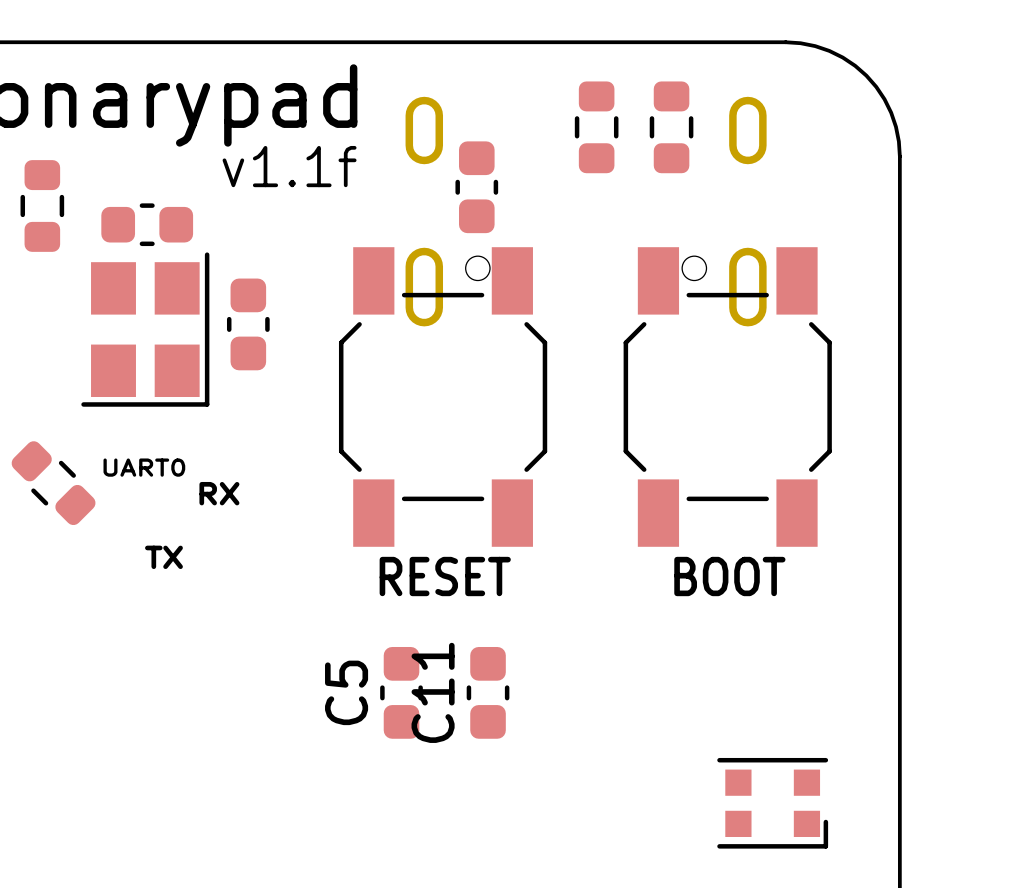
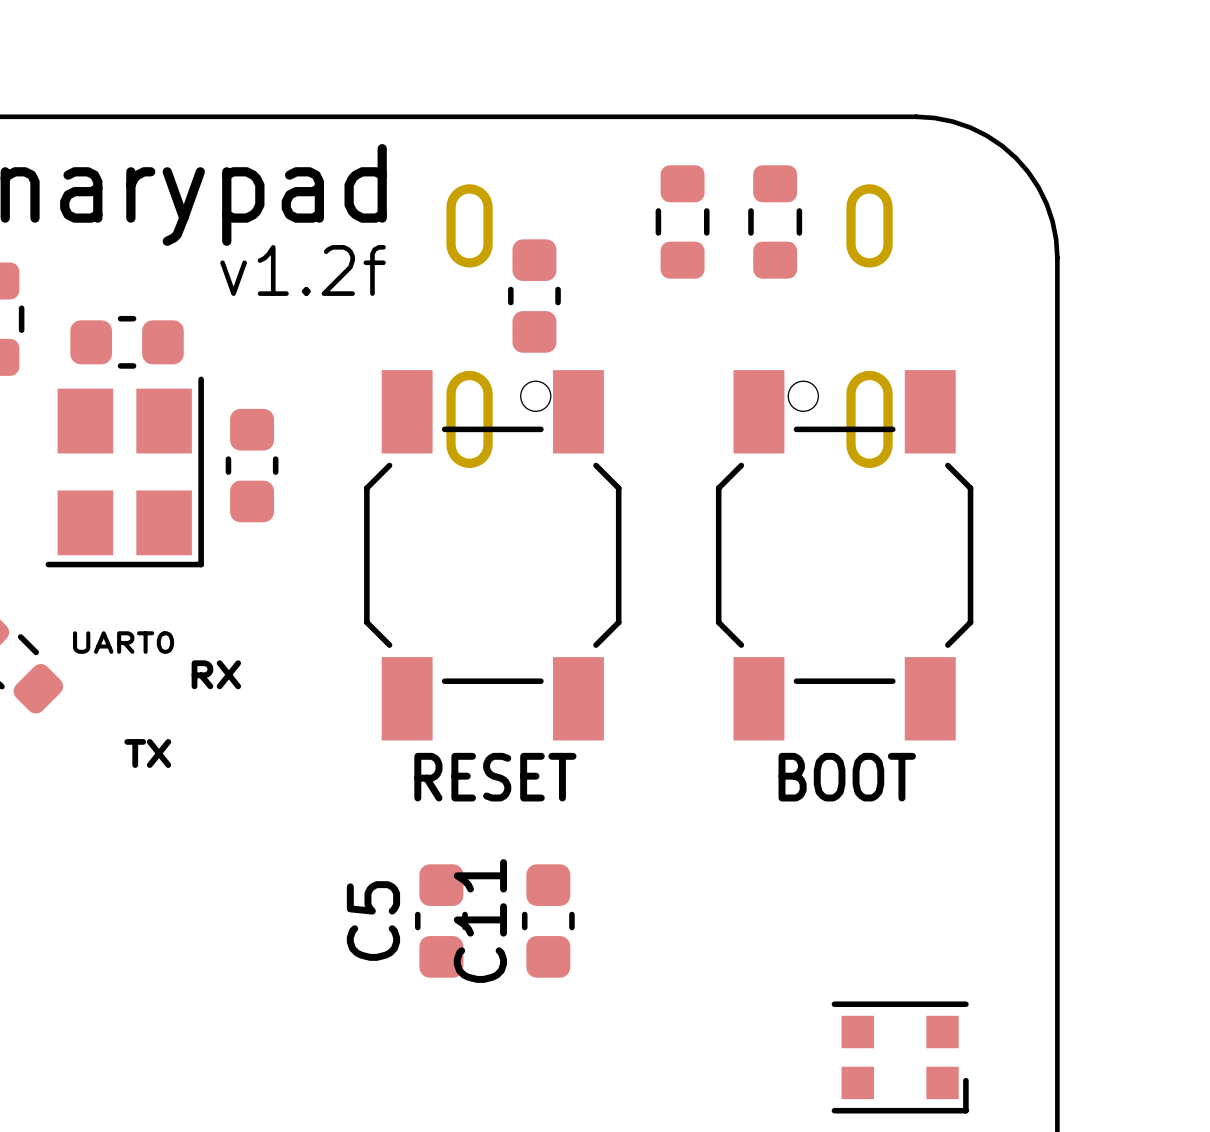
text: v1.1f (289, 166) -> v1.2f (303, 270)

